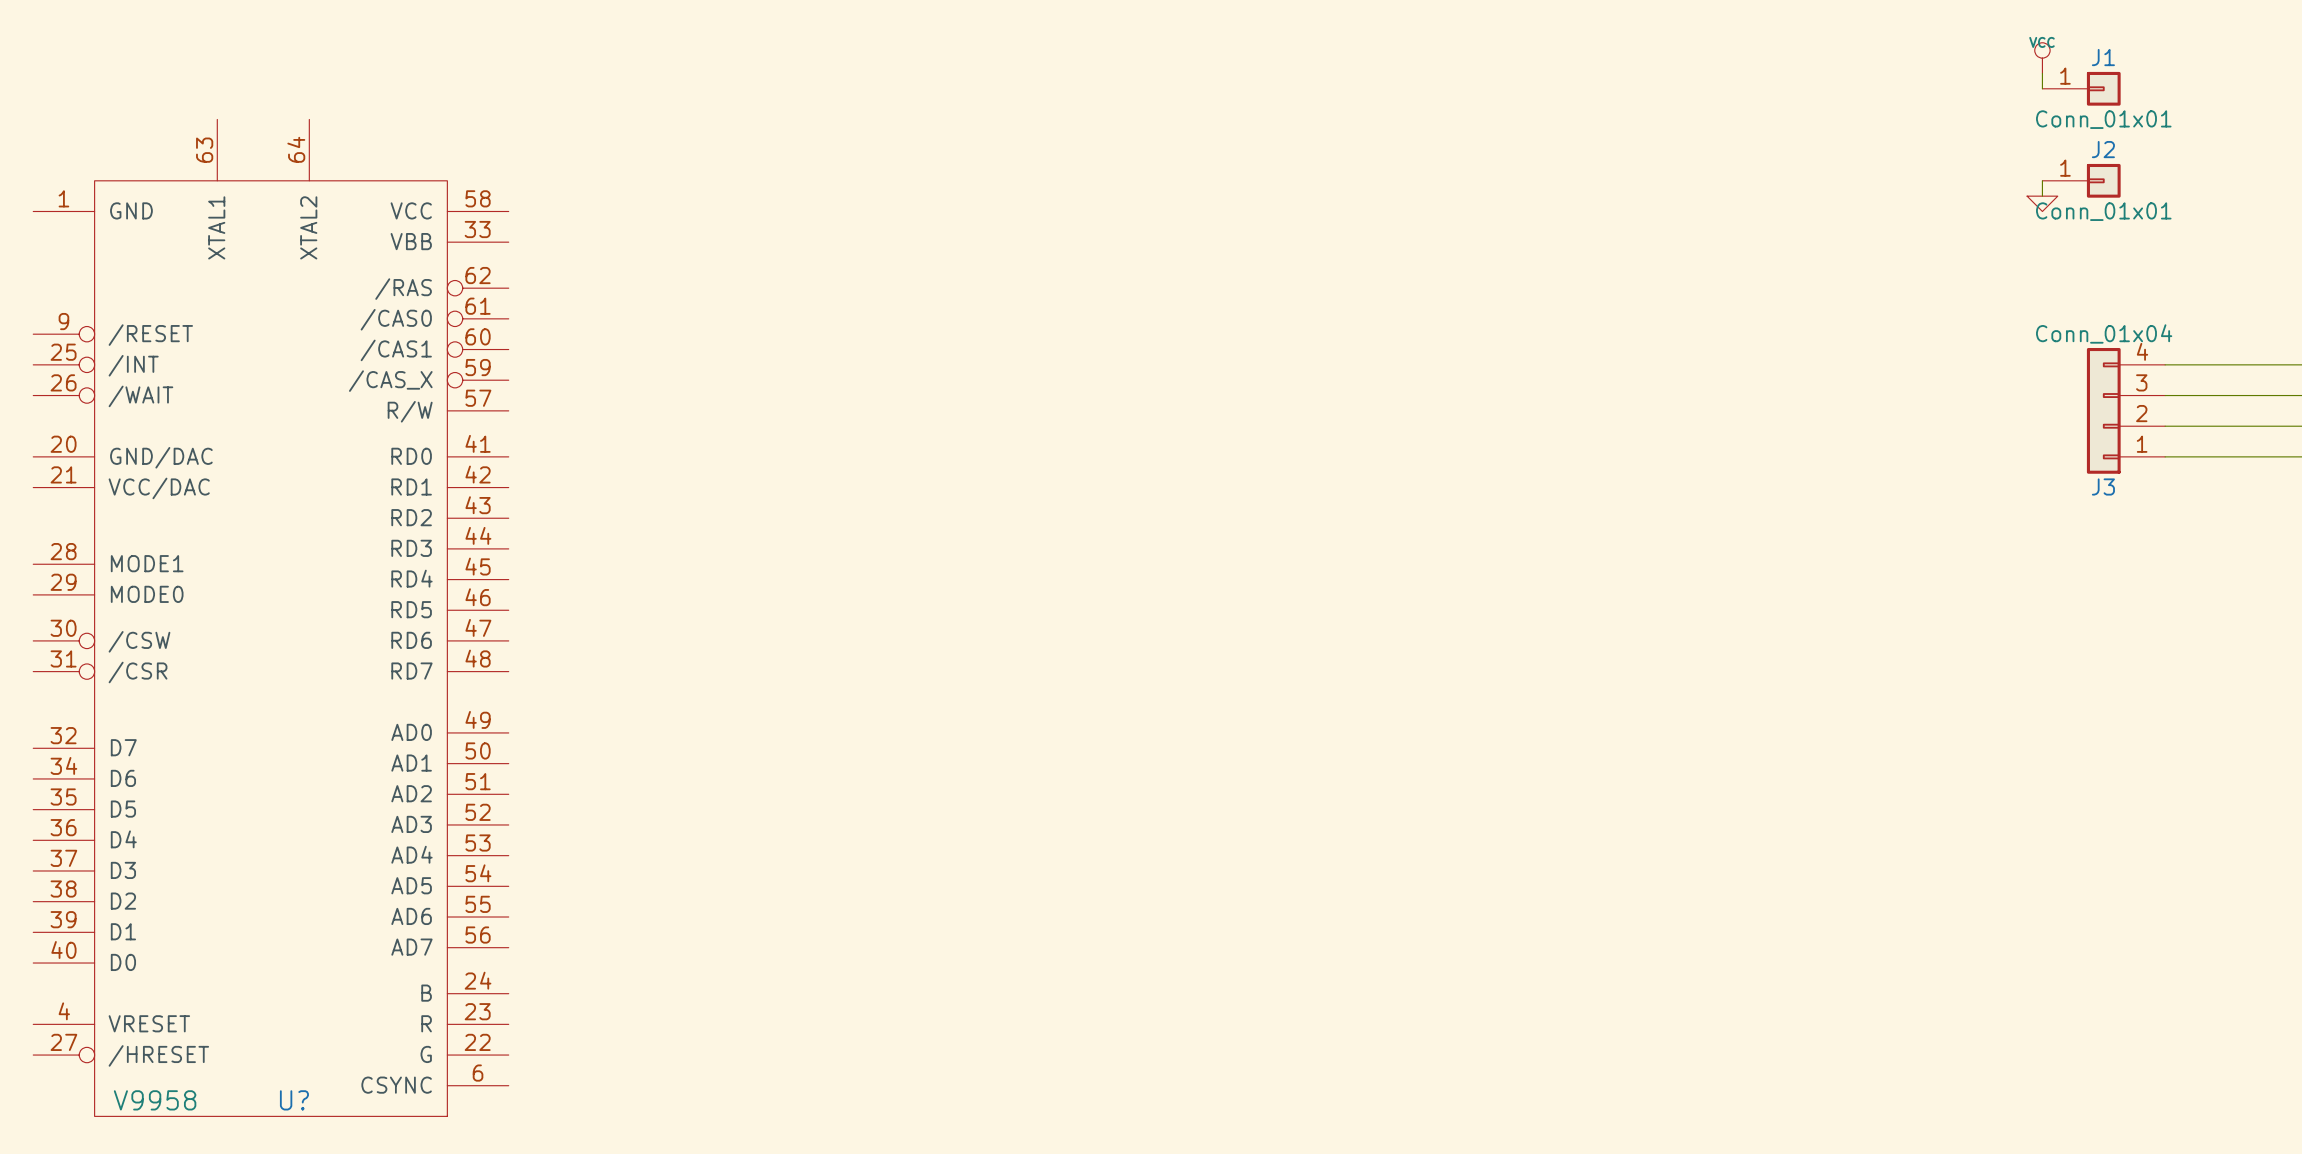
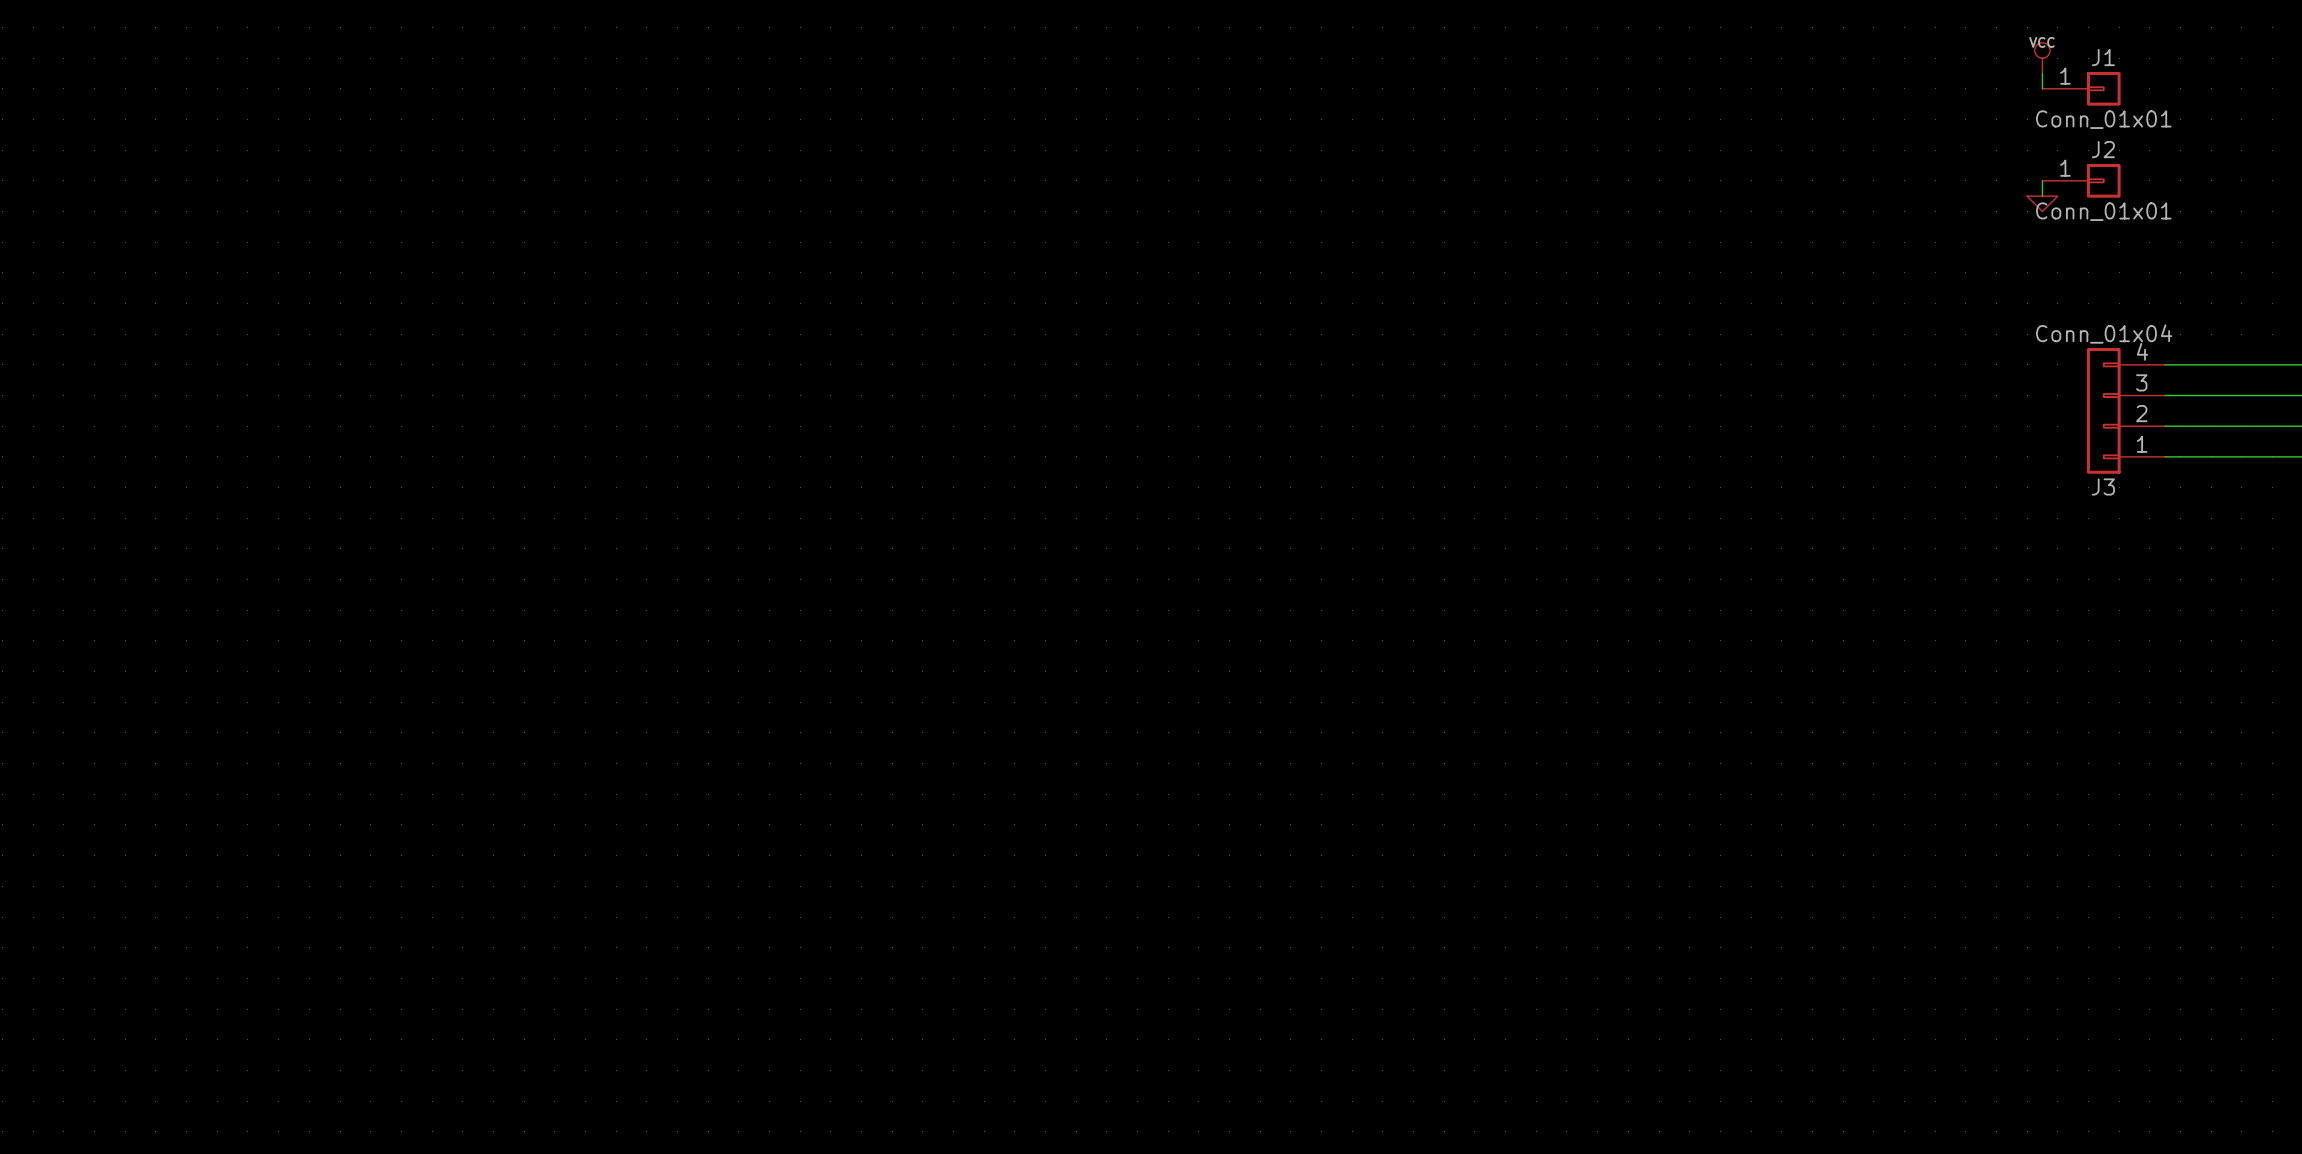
U?: V9958 (270, 617) -> none

